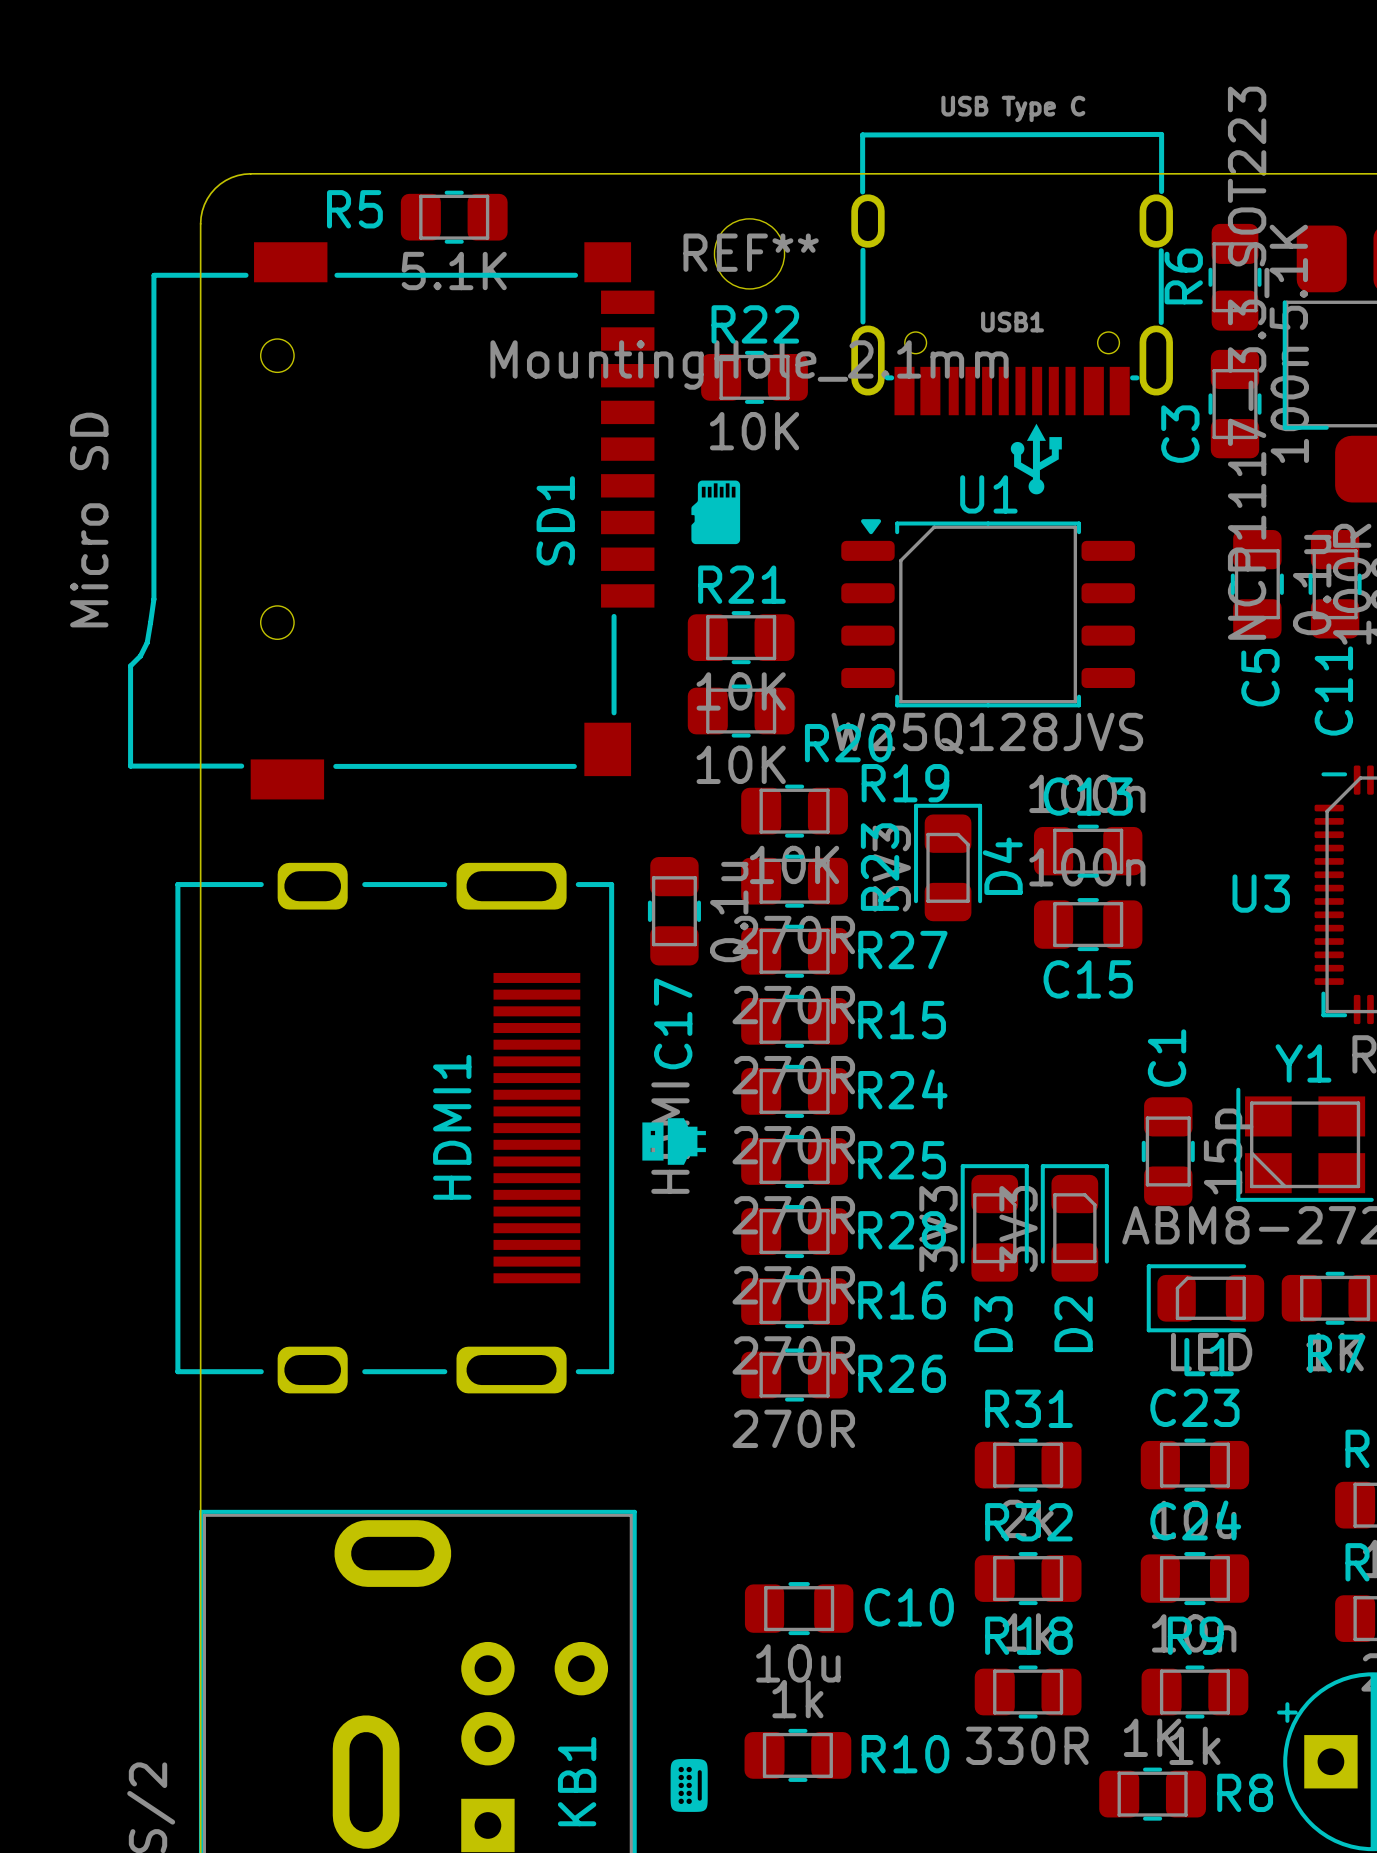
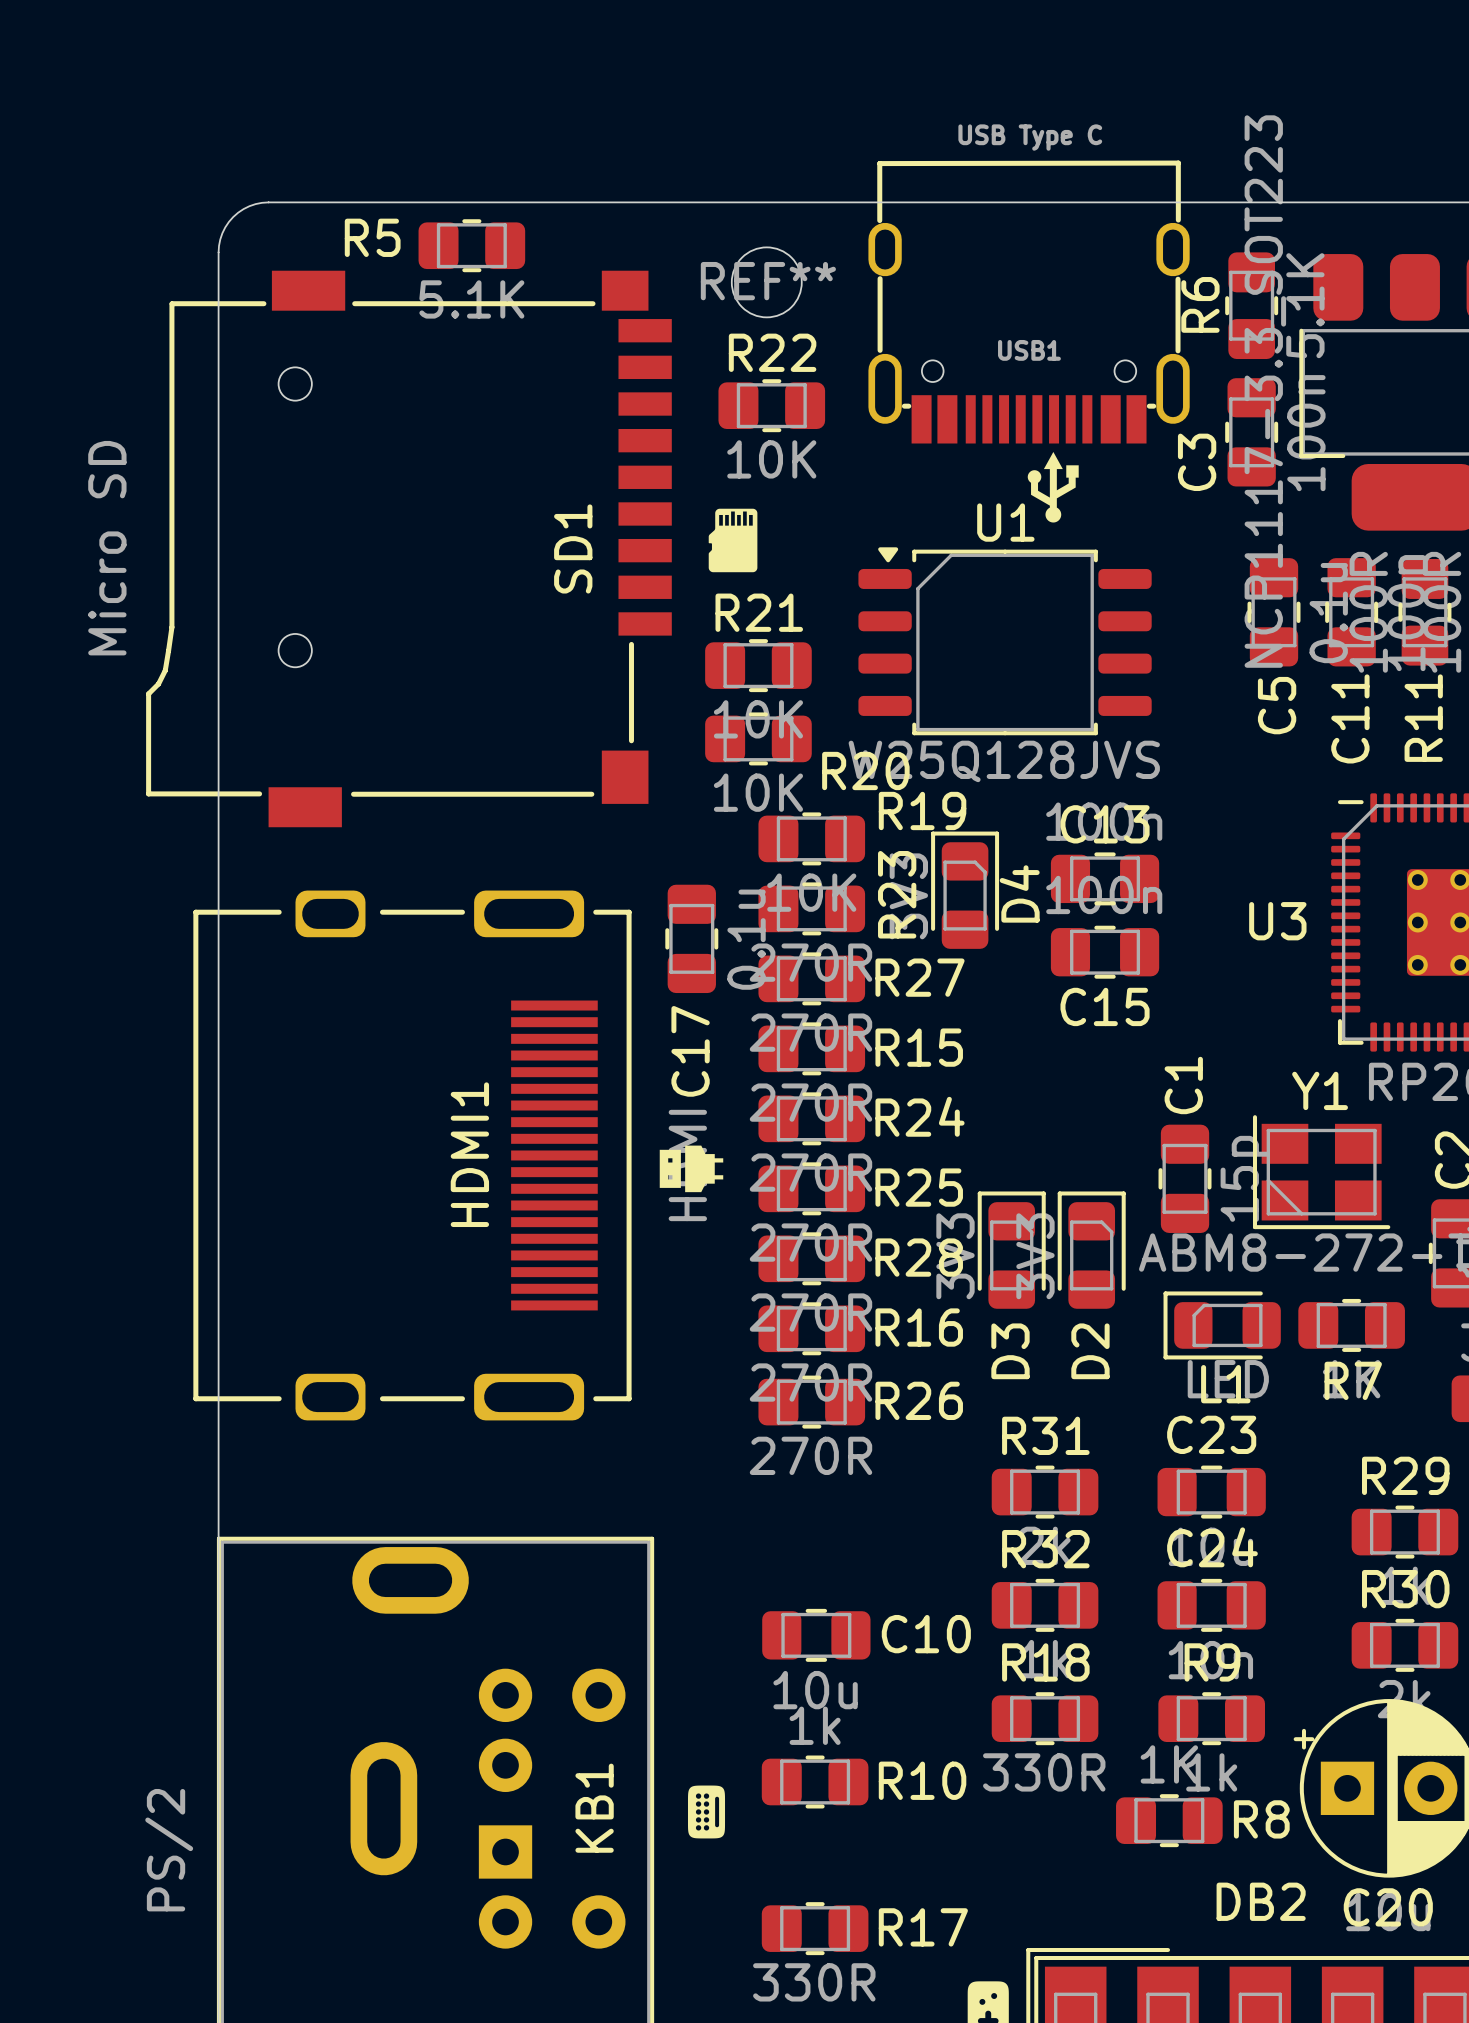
REF** value: MountingHole_2.1mm (749, 364) -> none

